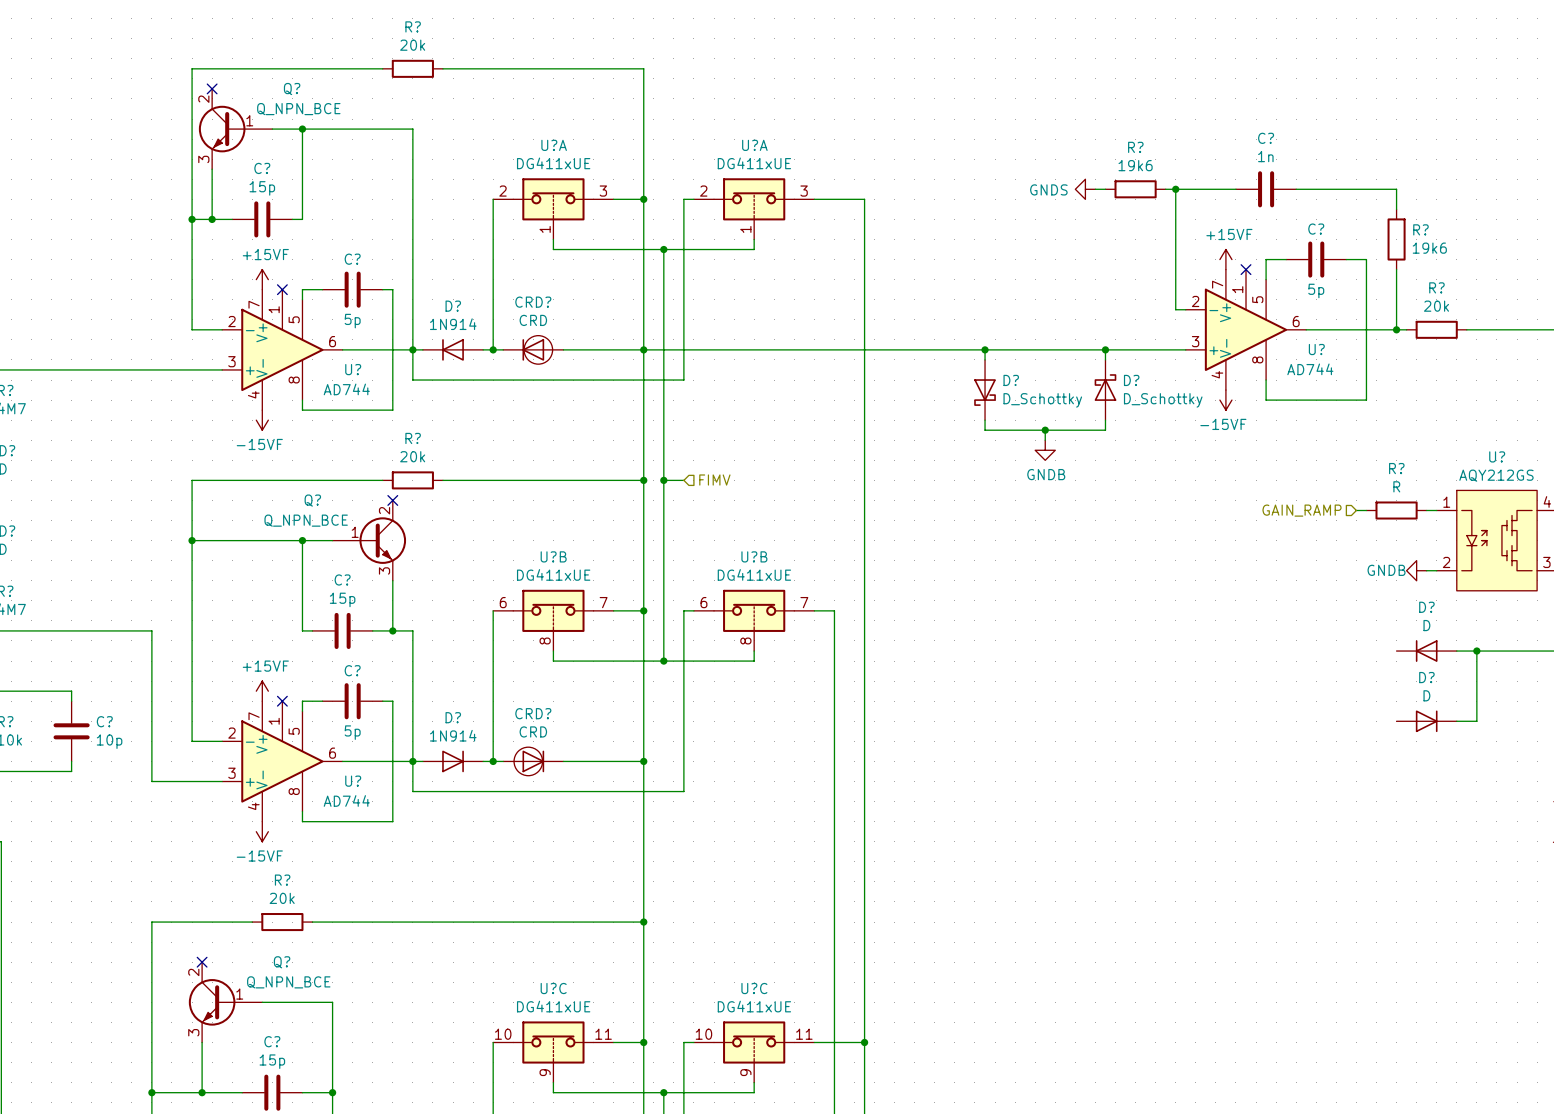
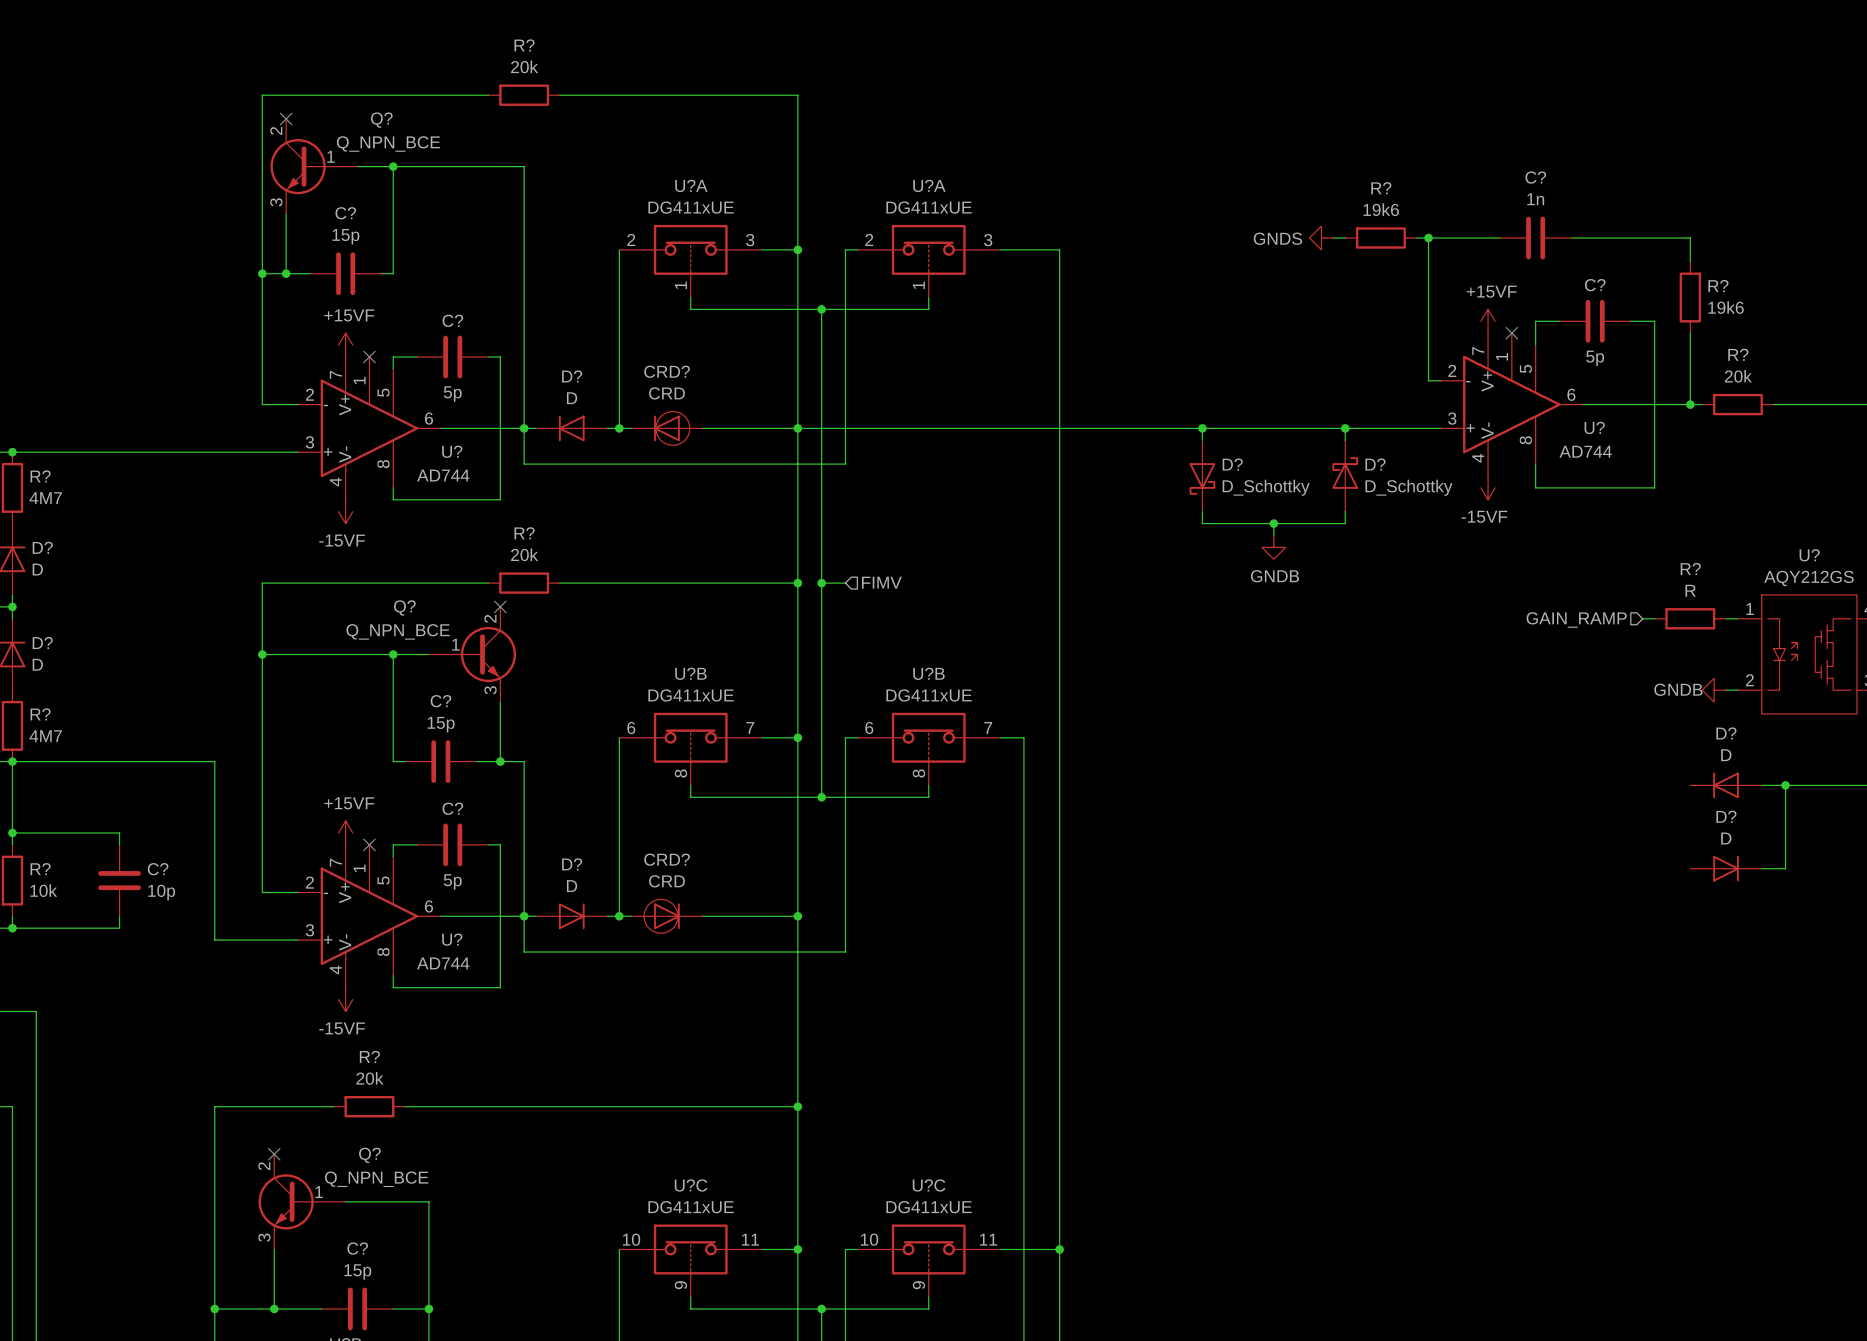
D? value: 1N914 (453, 324) -> D (572, 398)
D? value: 1N914 (453, 735) -> D (572, 886)

